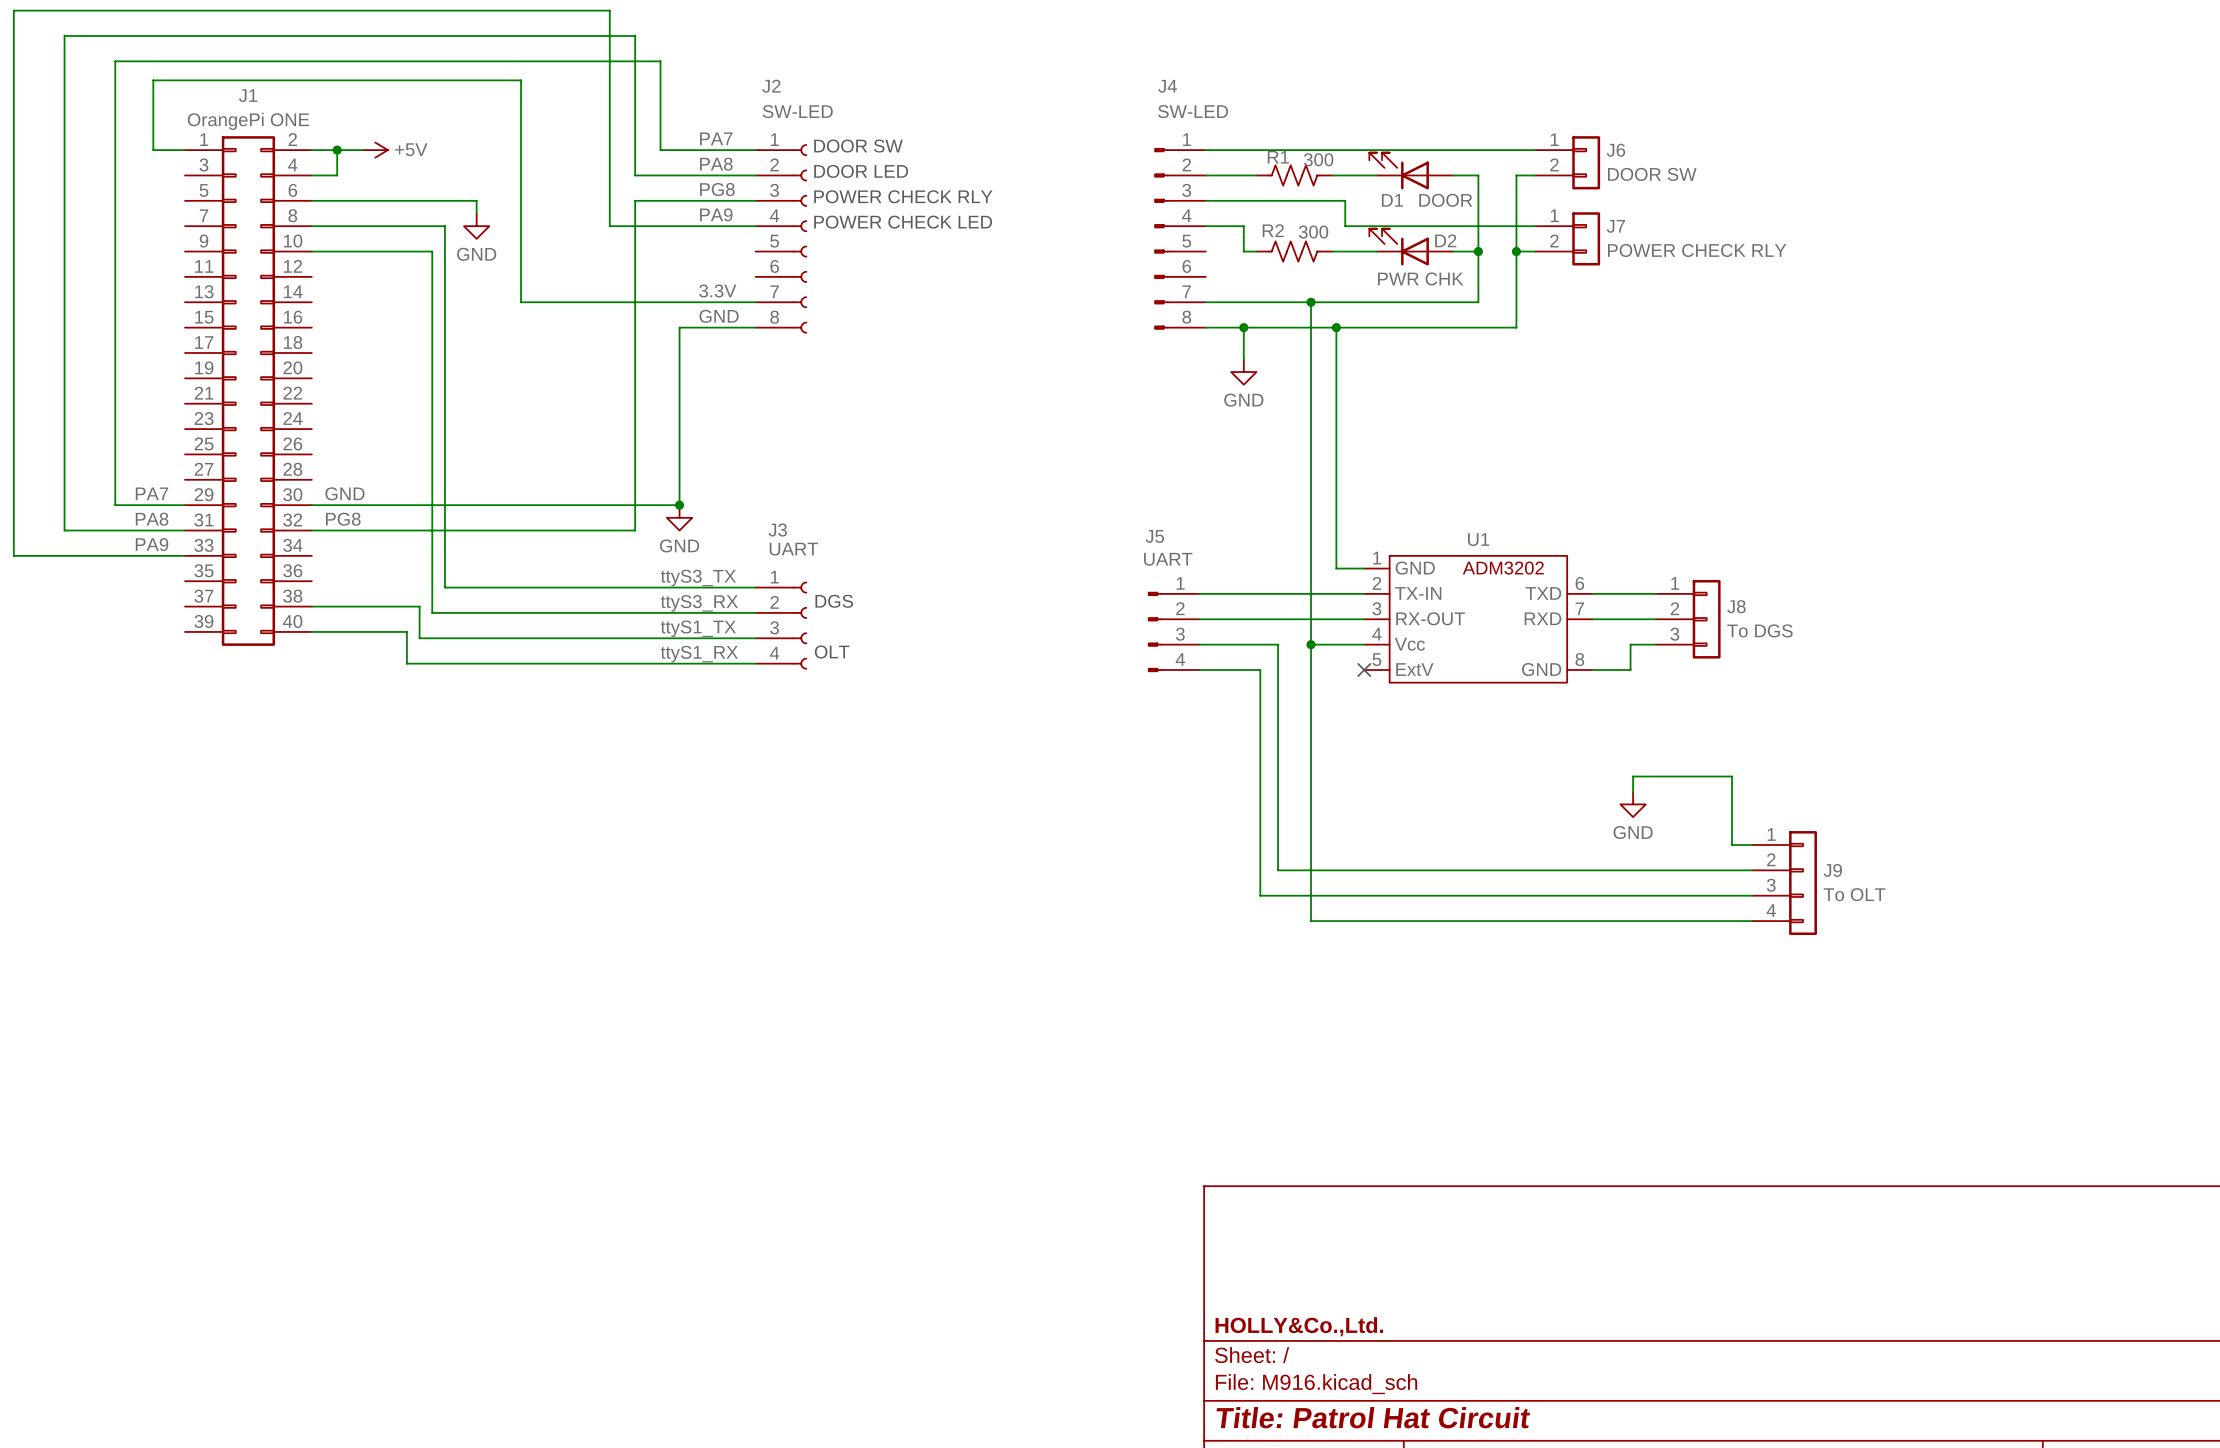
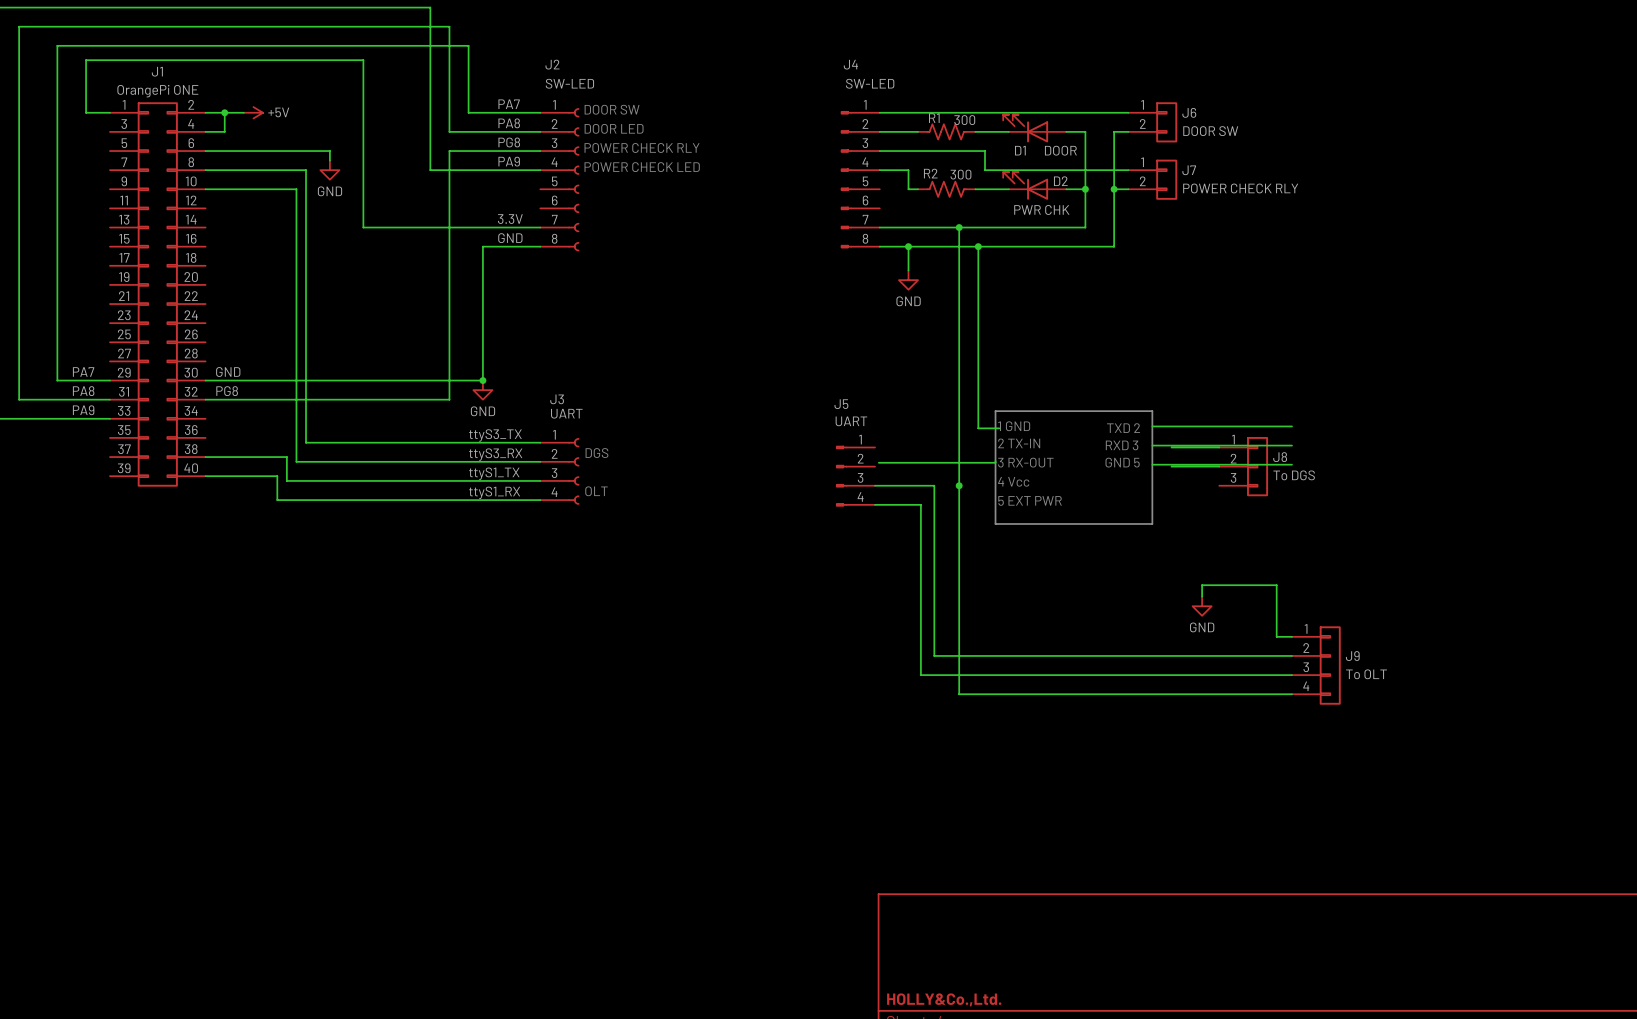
line: none -> (995, 411) (1152, 411) (1152, 523) (995, 523) (995, 411)
text: none -> 1 GND (1014, 426)
wire: none -> (1152, 426) (1291, 426)
text: none -> TXD 2 (1123, 428)
text: none -> 2 TX-IN (1019, 443)
text: none -> RXD 3 (1122, 445)
wire: none -> (1152, 445) (1291, 445)
wire: (1199, 593) (1364, 593) -> none
wire: none -> (995, 460) (995, 462) (878, 462)
text: none -> 3 RX-OUT (1025, 462)
text: none -> GND 5 (1122, 462)
wire: none -> (1152, 464) (1291, 464)
wire: (1199, 619) (1364, 619) -> none
U1: (1478, 619) -> none
text: none -> 4 Vcc (1013, 481)
wire: (1311, 644) (1364, 644) -> none
wire: (1655, 644) (1630, 644) (1630, 670) (1592, 670) -> none
text: none -> 5 EXT PWR (1030, 500)
no-connect mark: (1364, 670) -> none

